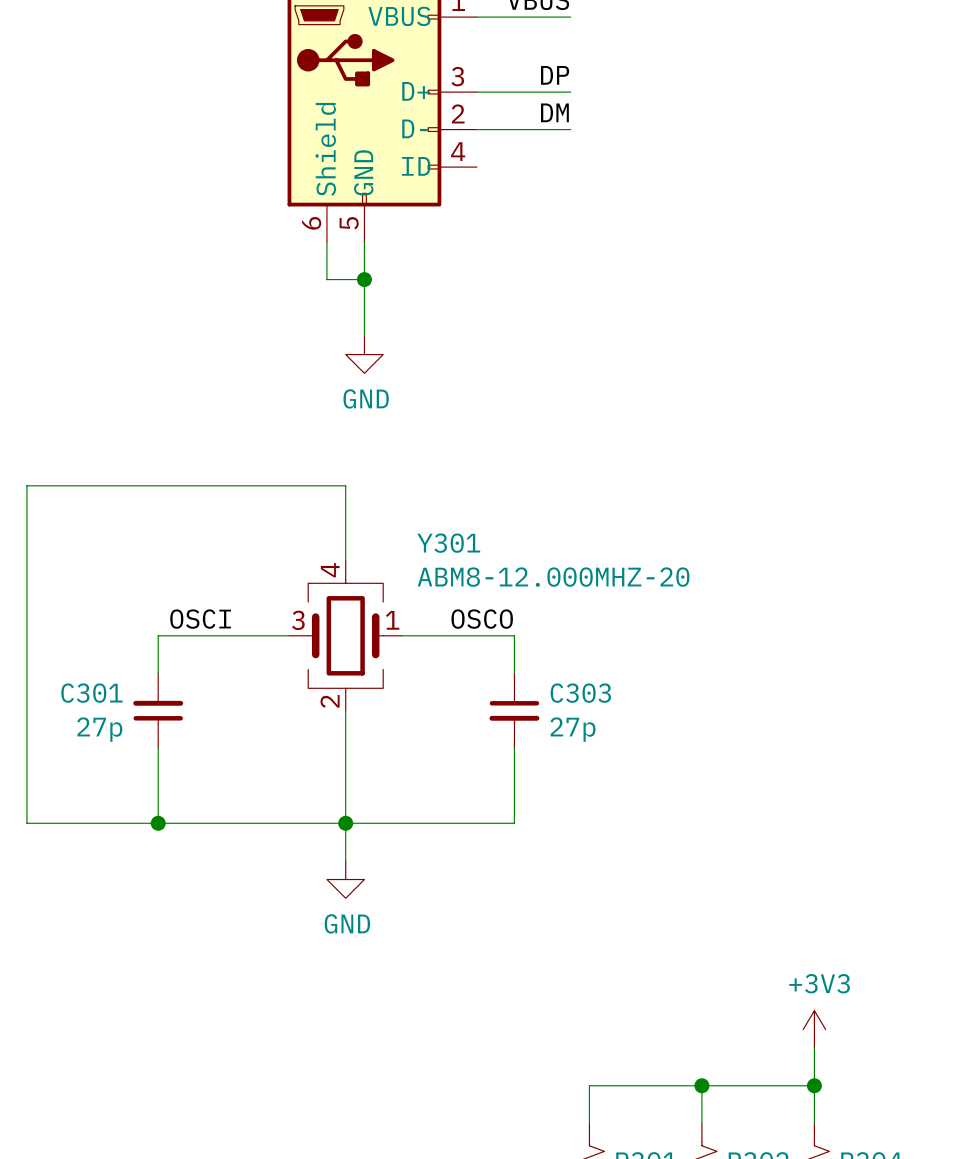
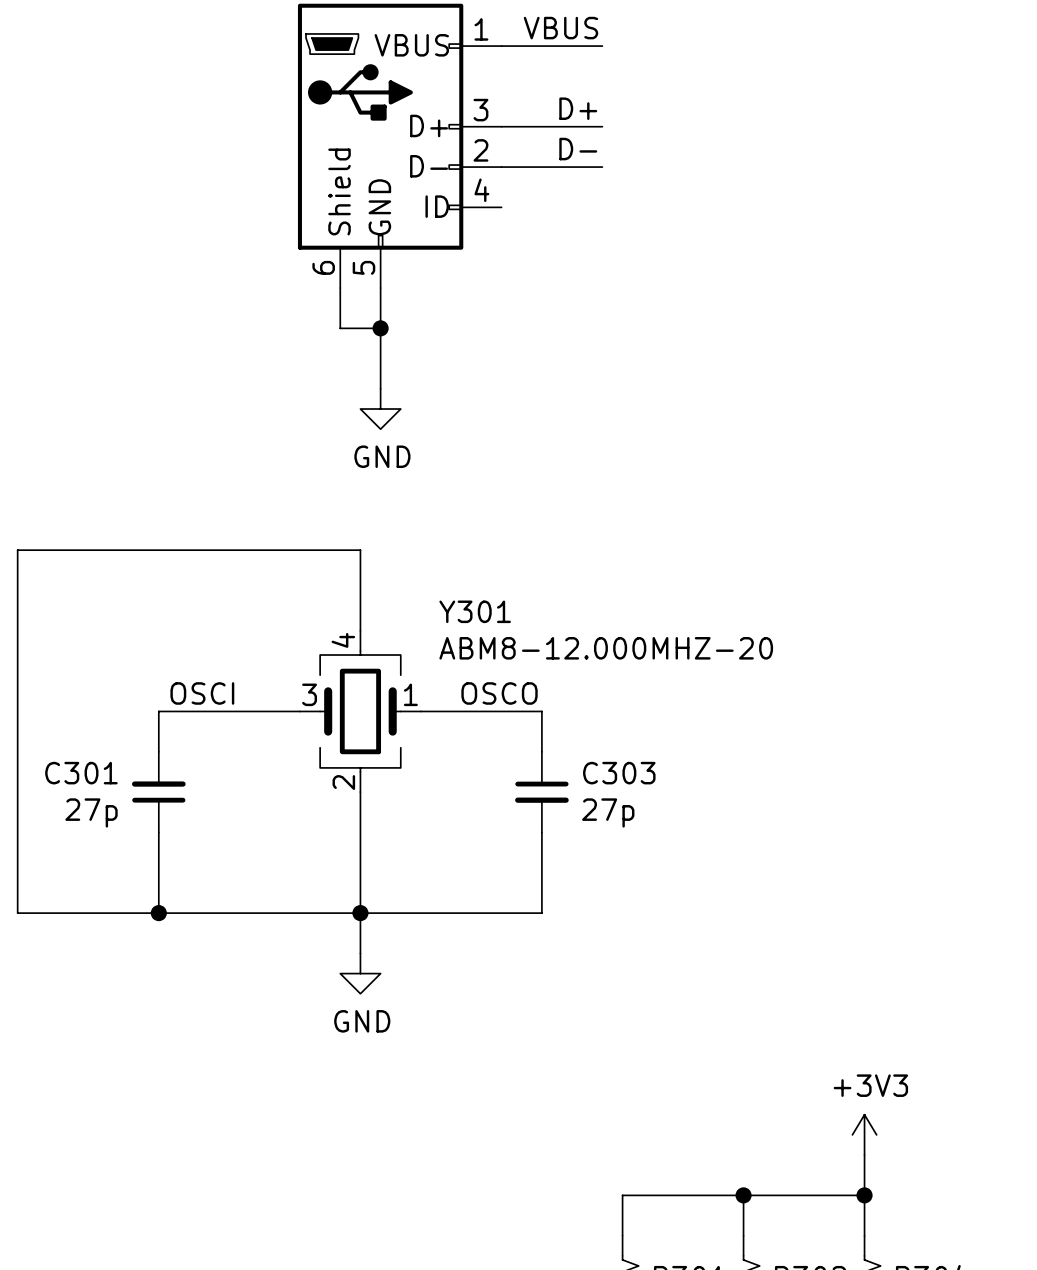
label: DP (555, 75) -> D+ (578, 108)
label: DM (554, 112) -> D- (578, 149)

